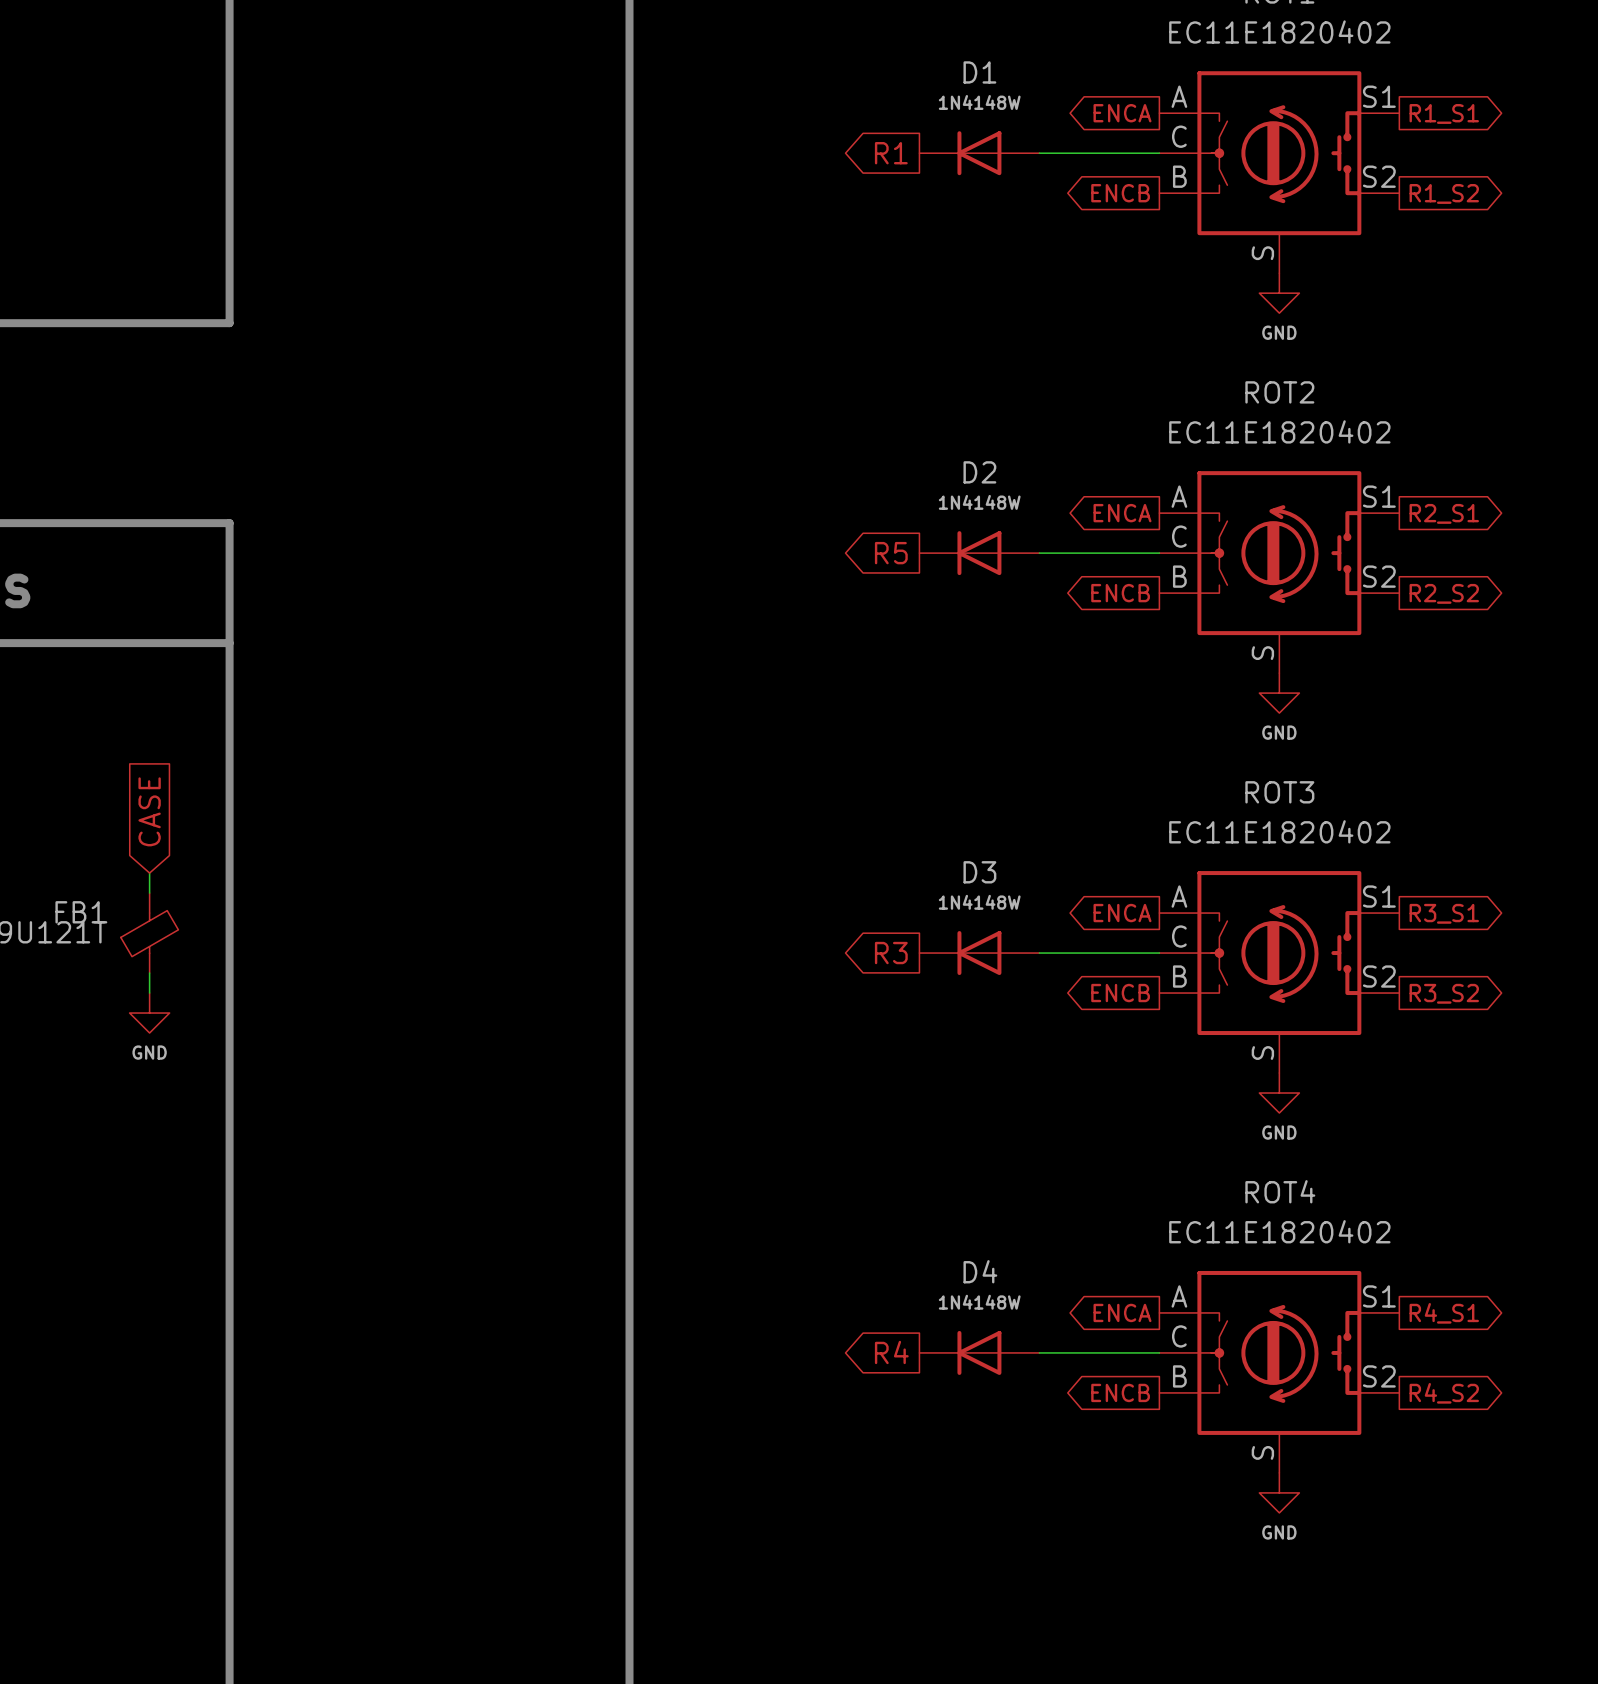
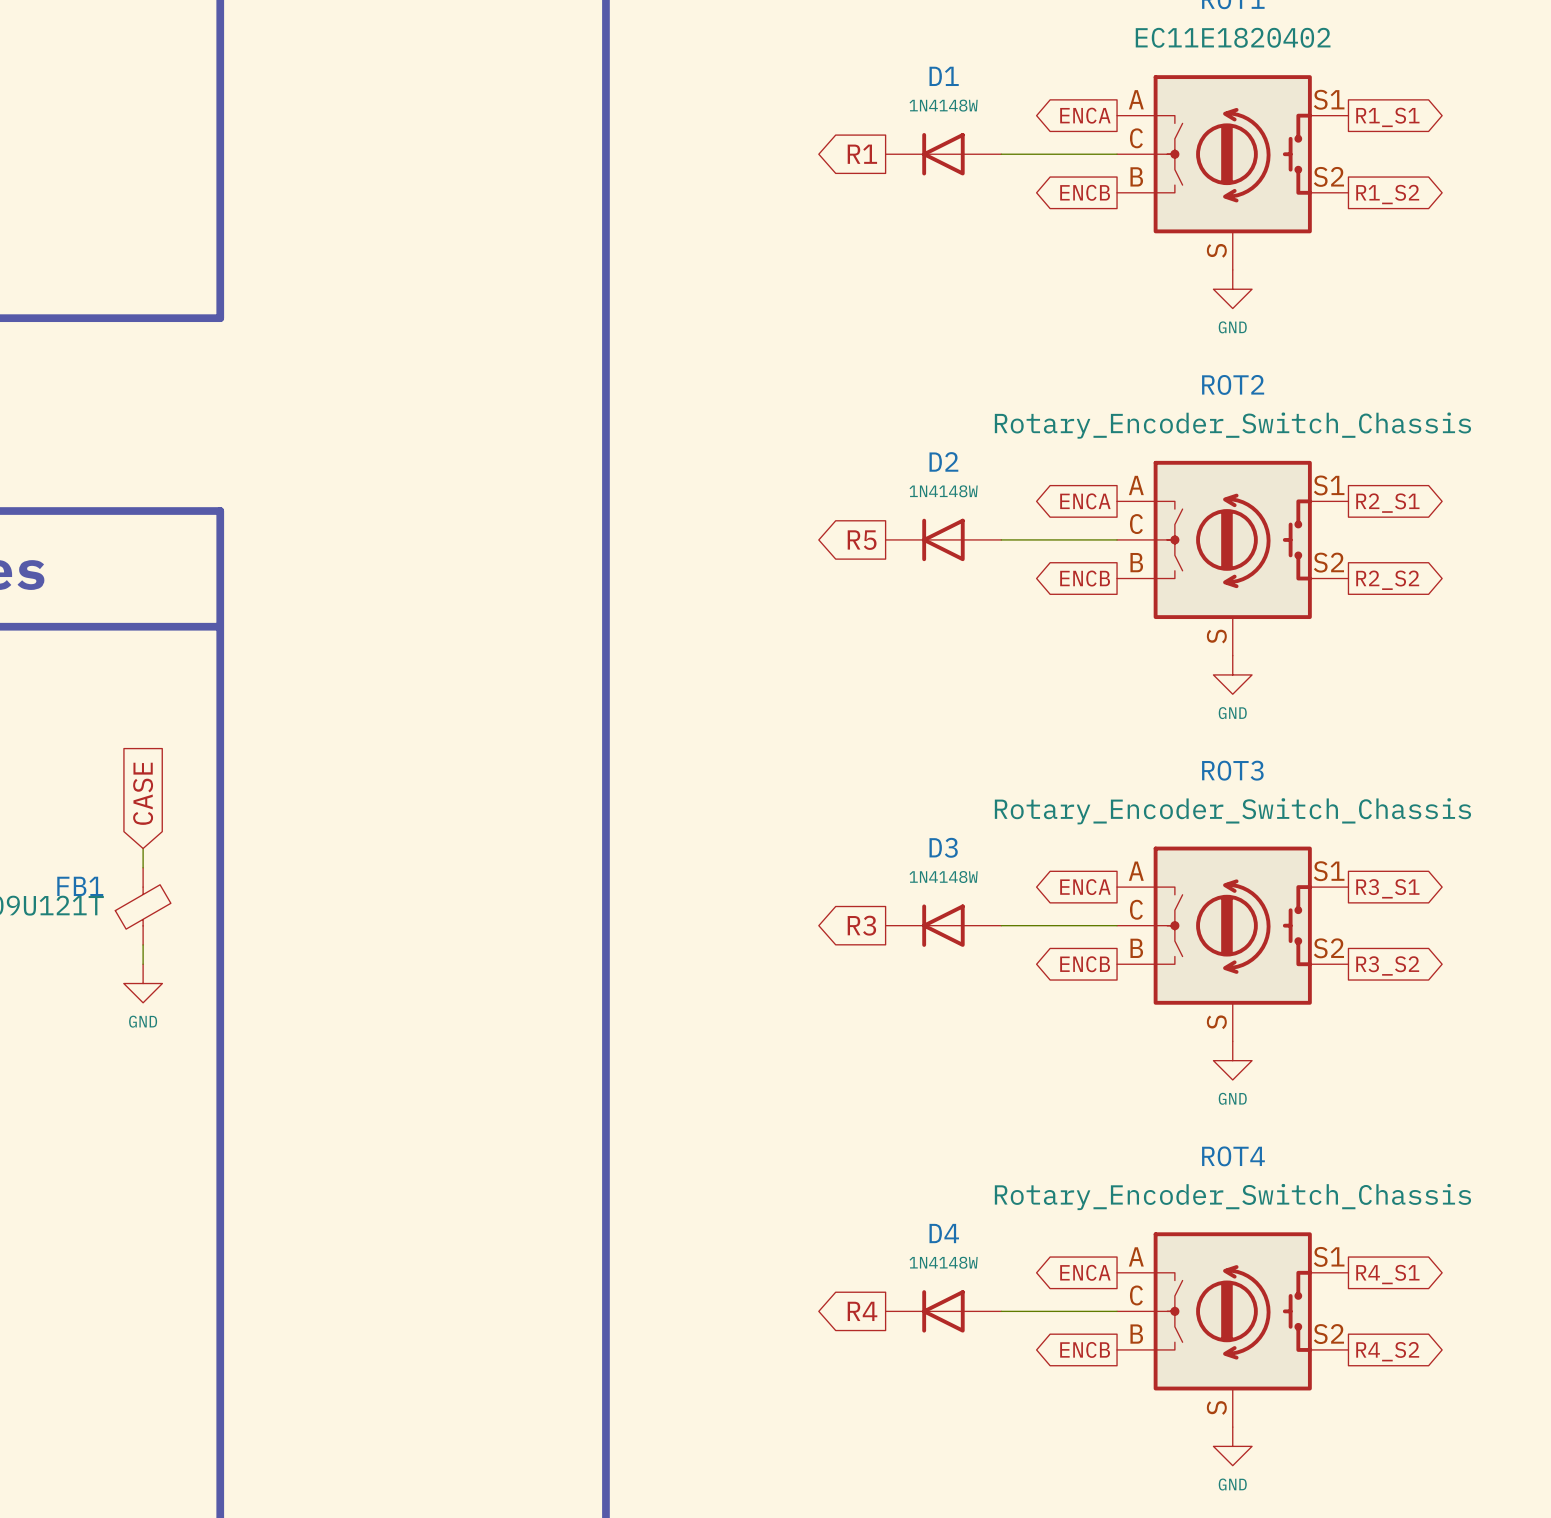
ROT2 value: EC11E1820402 (1279, 431) -> Rotary_Encoder_Switch_Chassis (1232, 425)
ROT3 value: EC11E1820402 (1279, 831) -> Rotary_Encoder_Switch_Chassis (1232, 811)
ROT4 value: EC11E1820402 (1279, 1231) -> Rotary_Encoder_Switch_Chassis (1232, 1197)

